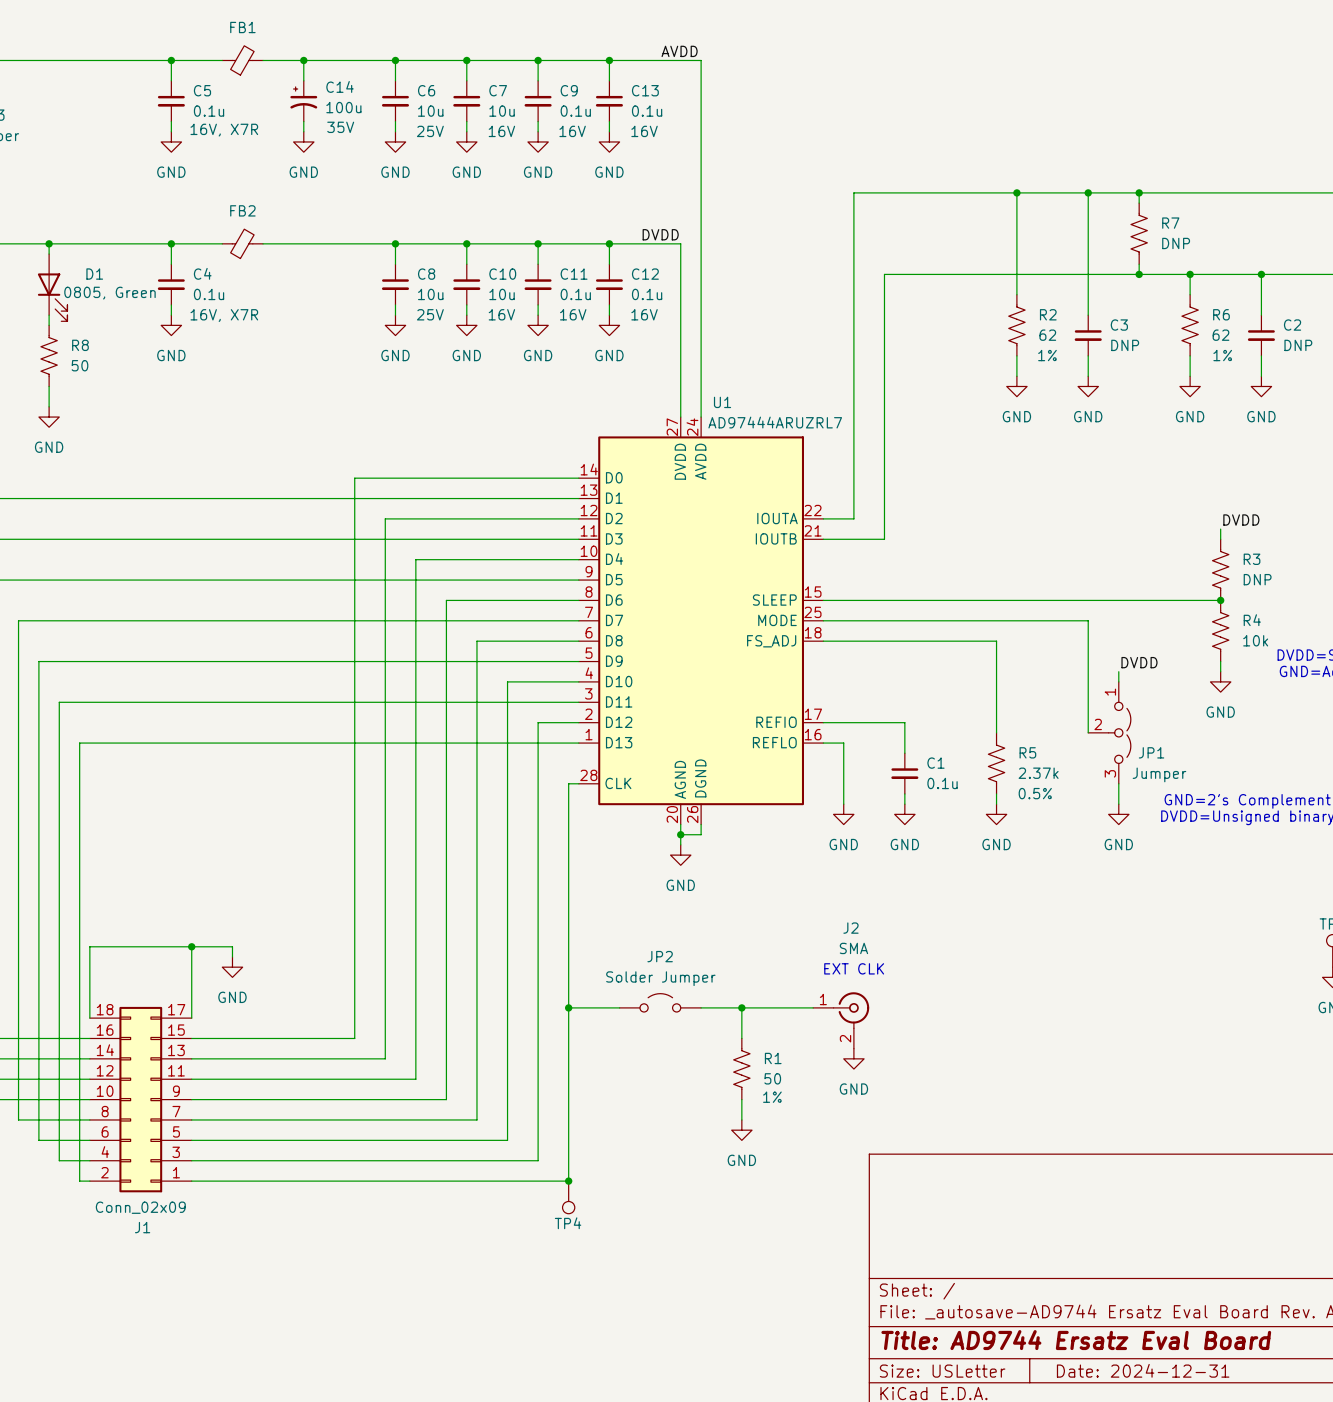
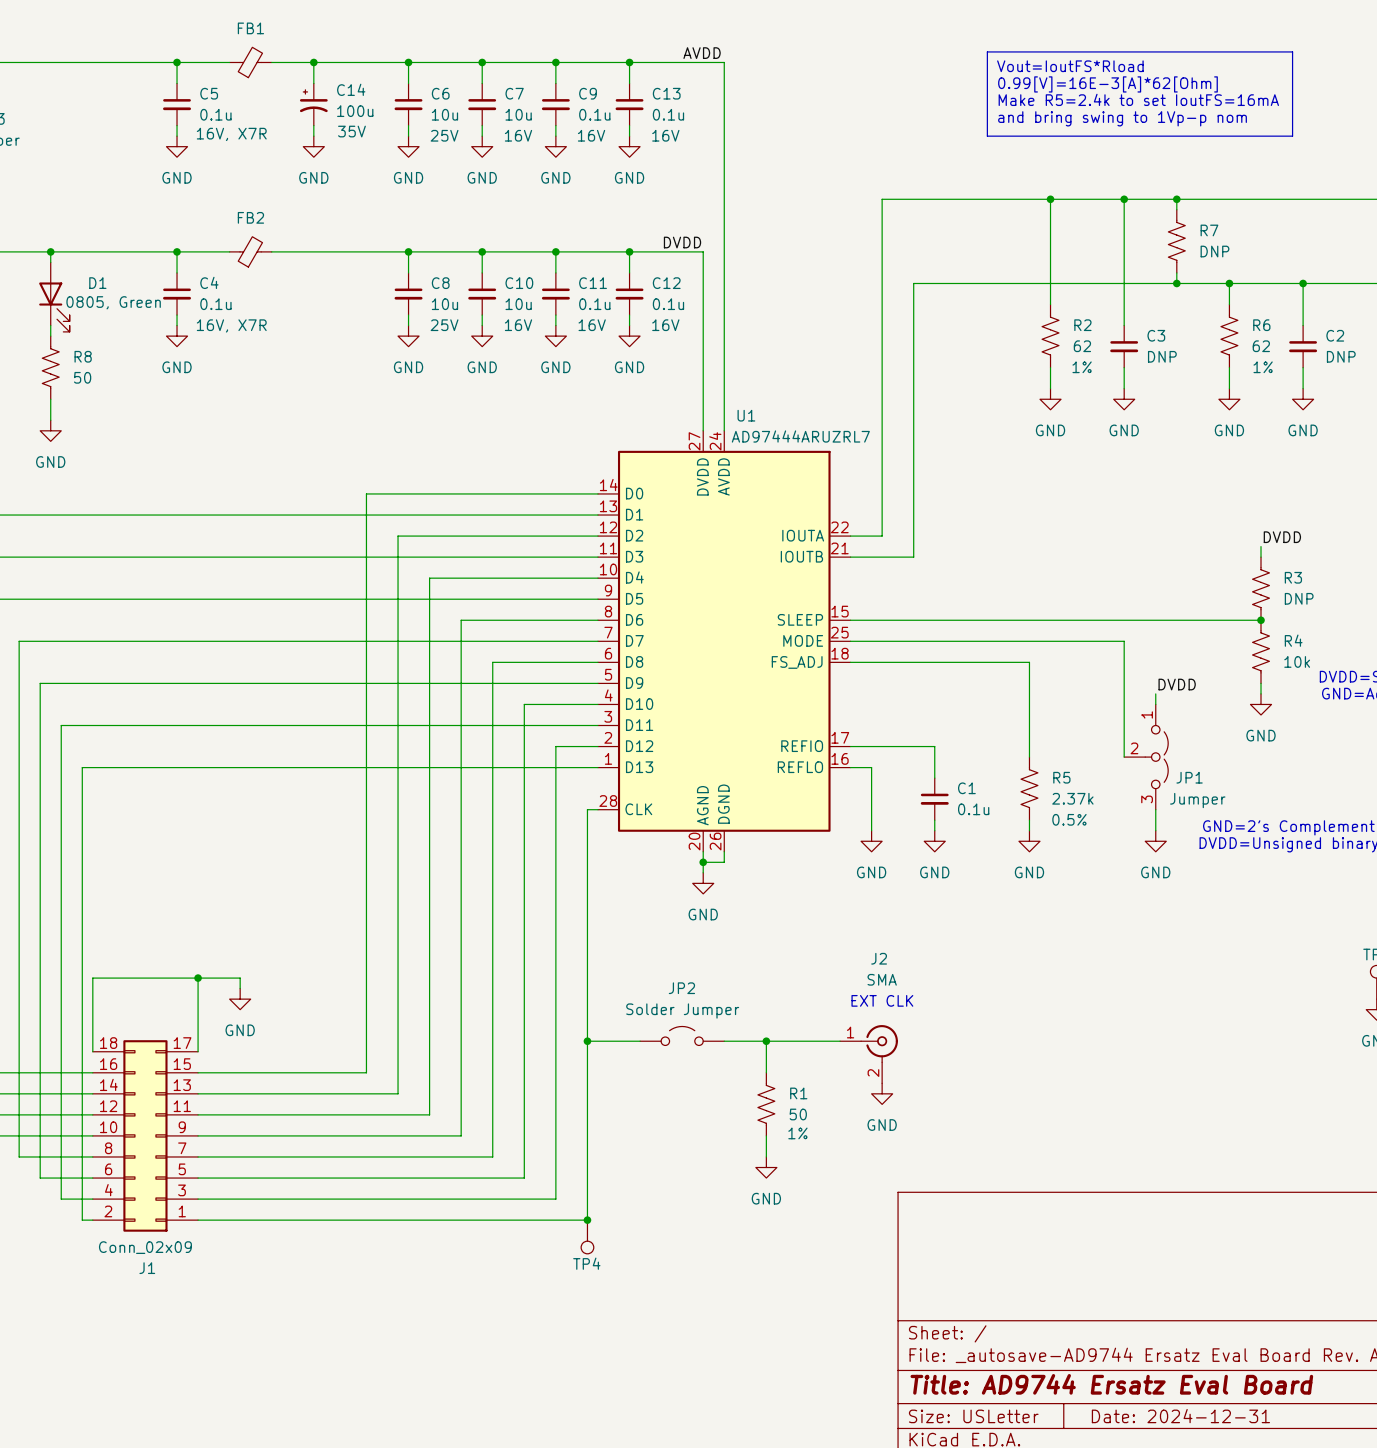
line: none -> (987, 51) (1292, 51) (1292, 136) (987, 136) (987, 51)
text: none -> Vout=IoutFS*Rload (1070, 66)
text: none -> 0.99[V]=16E-3[A]*62[Ohm] (1107, 84)
text: none -> Make R5=2.4k to set IoutFS=16mA (1138, 99)
text: none -> and bring swing to 1Vp-p nom (1122, 118)

